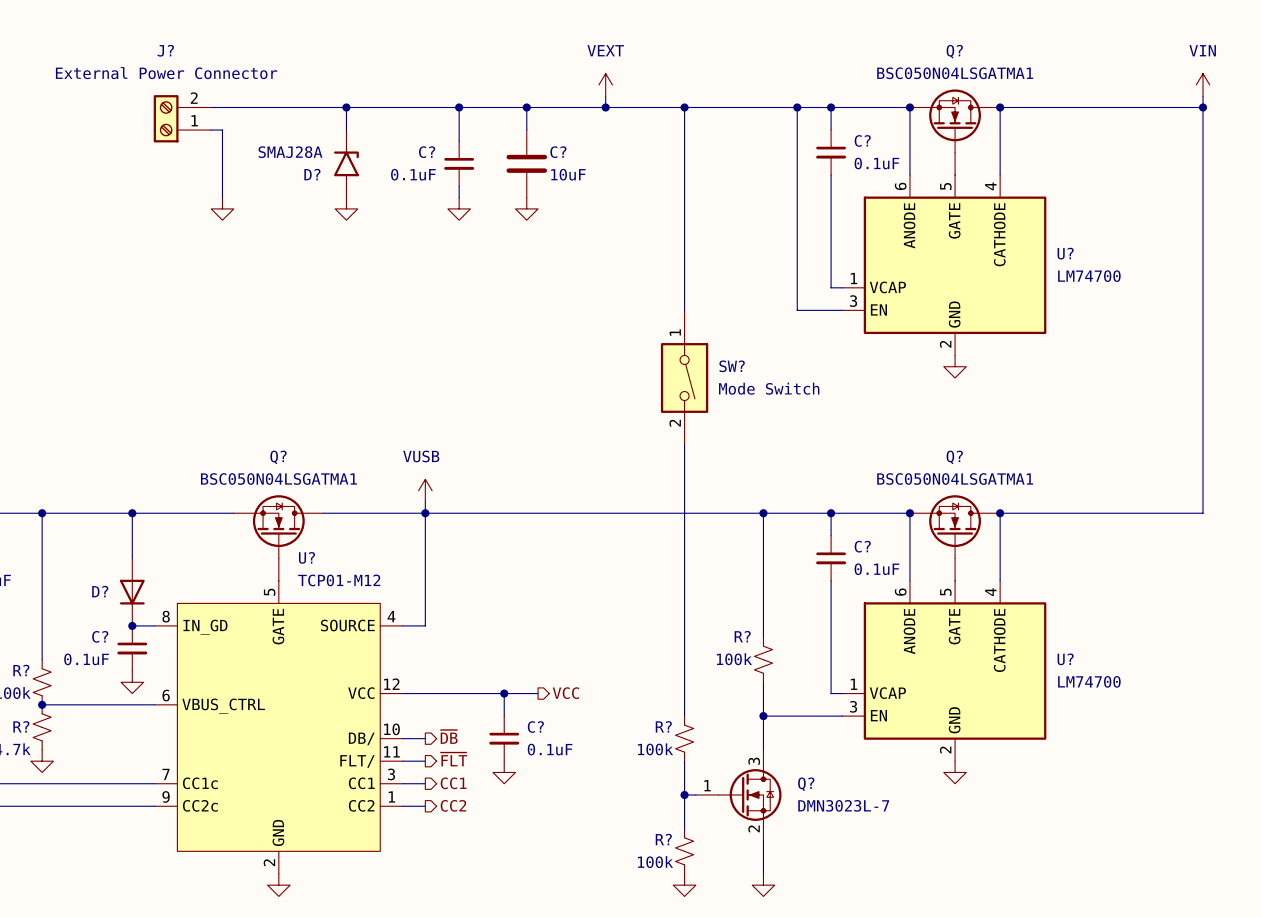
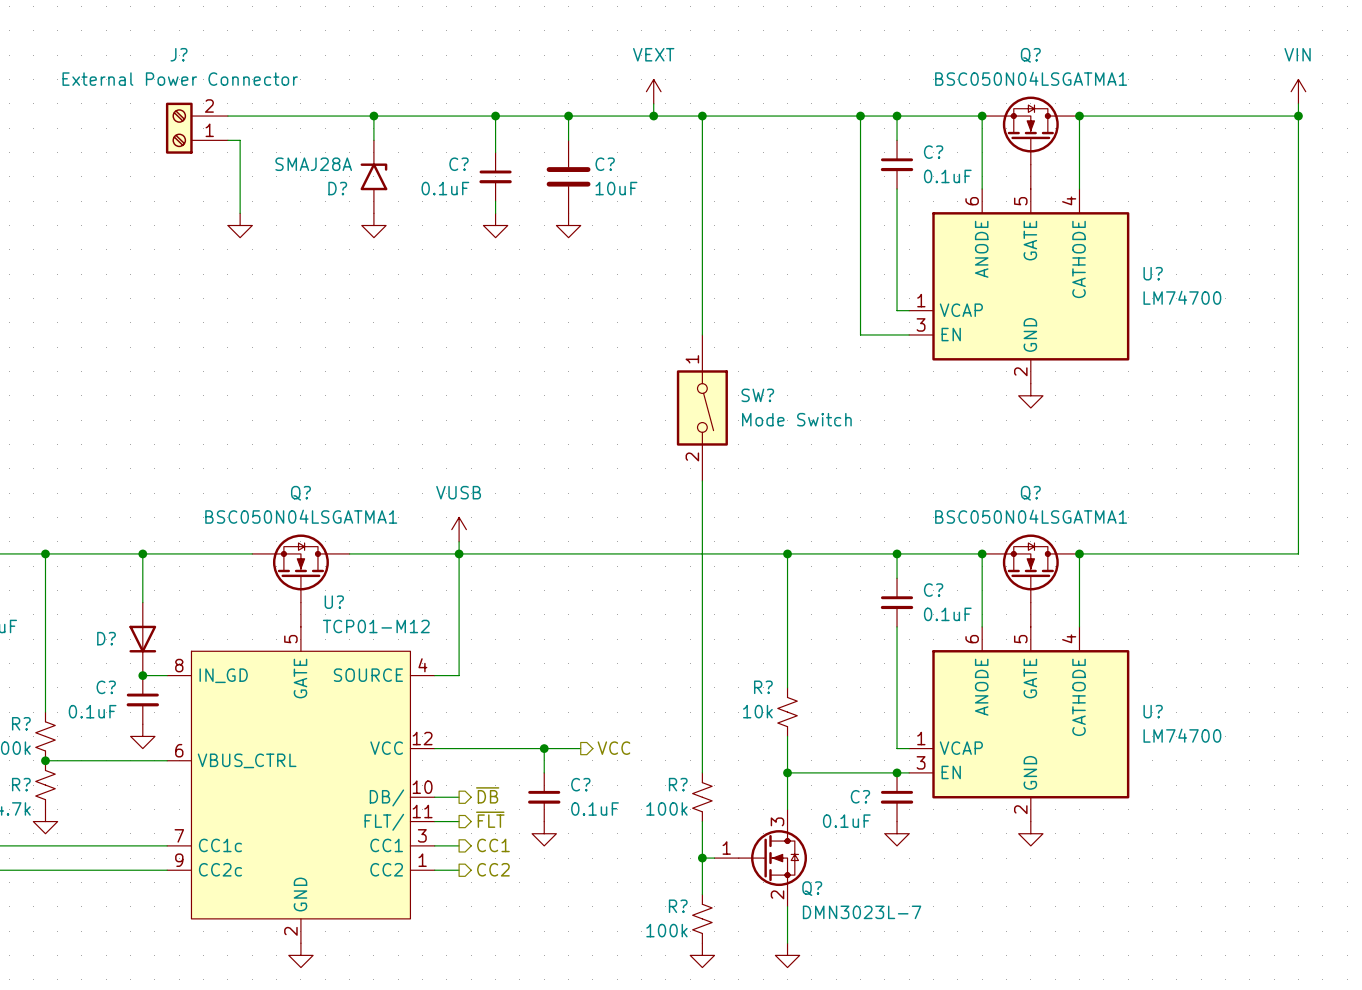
wire: (684, 107) (684, 310) -> (702, 116) (702, 334)
junction position: (684, 107) -> (702, 116)
SW? position: (684, 377) -> (702, 407)
wire: (684, 445) (684, 716) -> (702, 480) (702, 772)
wire: (763, 513) (763, 637) -> (787, 553) (787, 687)
junction position: (763, 513) -> (787, 553)
R?: none -> 10k (787, 712)
R?: 100k (763, 659) -> none
wire: (763, 682) (763, 749) -> (787, 736) (787, 809)
wire: none -> (787, 772) (824, 772)
junction: none -> (787, 772)
junction: (763, 716) -> none
junction: none -> (897, 772)
R? position: (684, 738) -> (702, 797)
C?: none -> 0.1uF (897, 797)
wire: (684, 761) (684, 828) -> (702, 821) (702, 894)
power symbol: none -> (897, 833)
Q? name position: Q? (806, 784) -> Q? (812, 888)
junction position: (684, 795) -> (702, 858)
Q? position: (738, 795) -> (760, 858)
Q? value position: DMN3023L-7 (843, 805) -> DMN3023L-7 (862, 912)
wire: (763, 840) (763, 873) -> (787, 906) (787, 943)
R? position: (684, 851) -> (702, 918)
power symbol: none -> (702, 955)
power symbol: (684, 885) -> none
power symbol: none -> (787, 955)
power symbol: (763, 885) -> none

